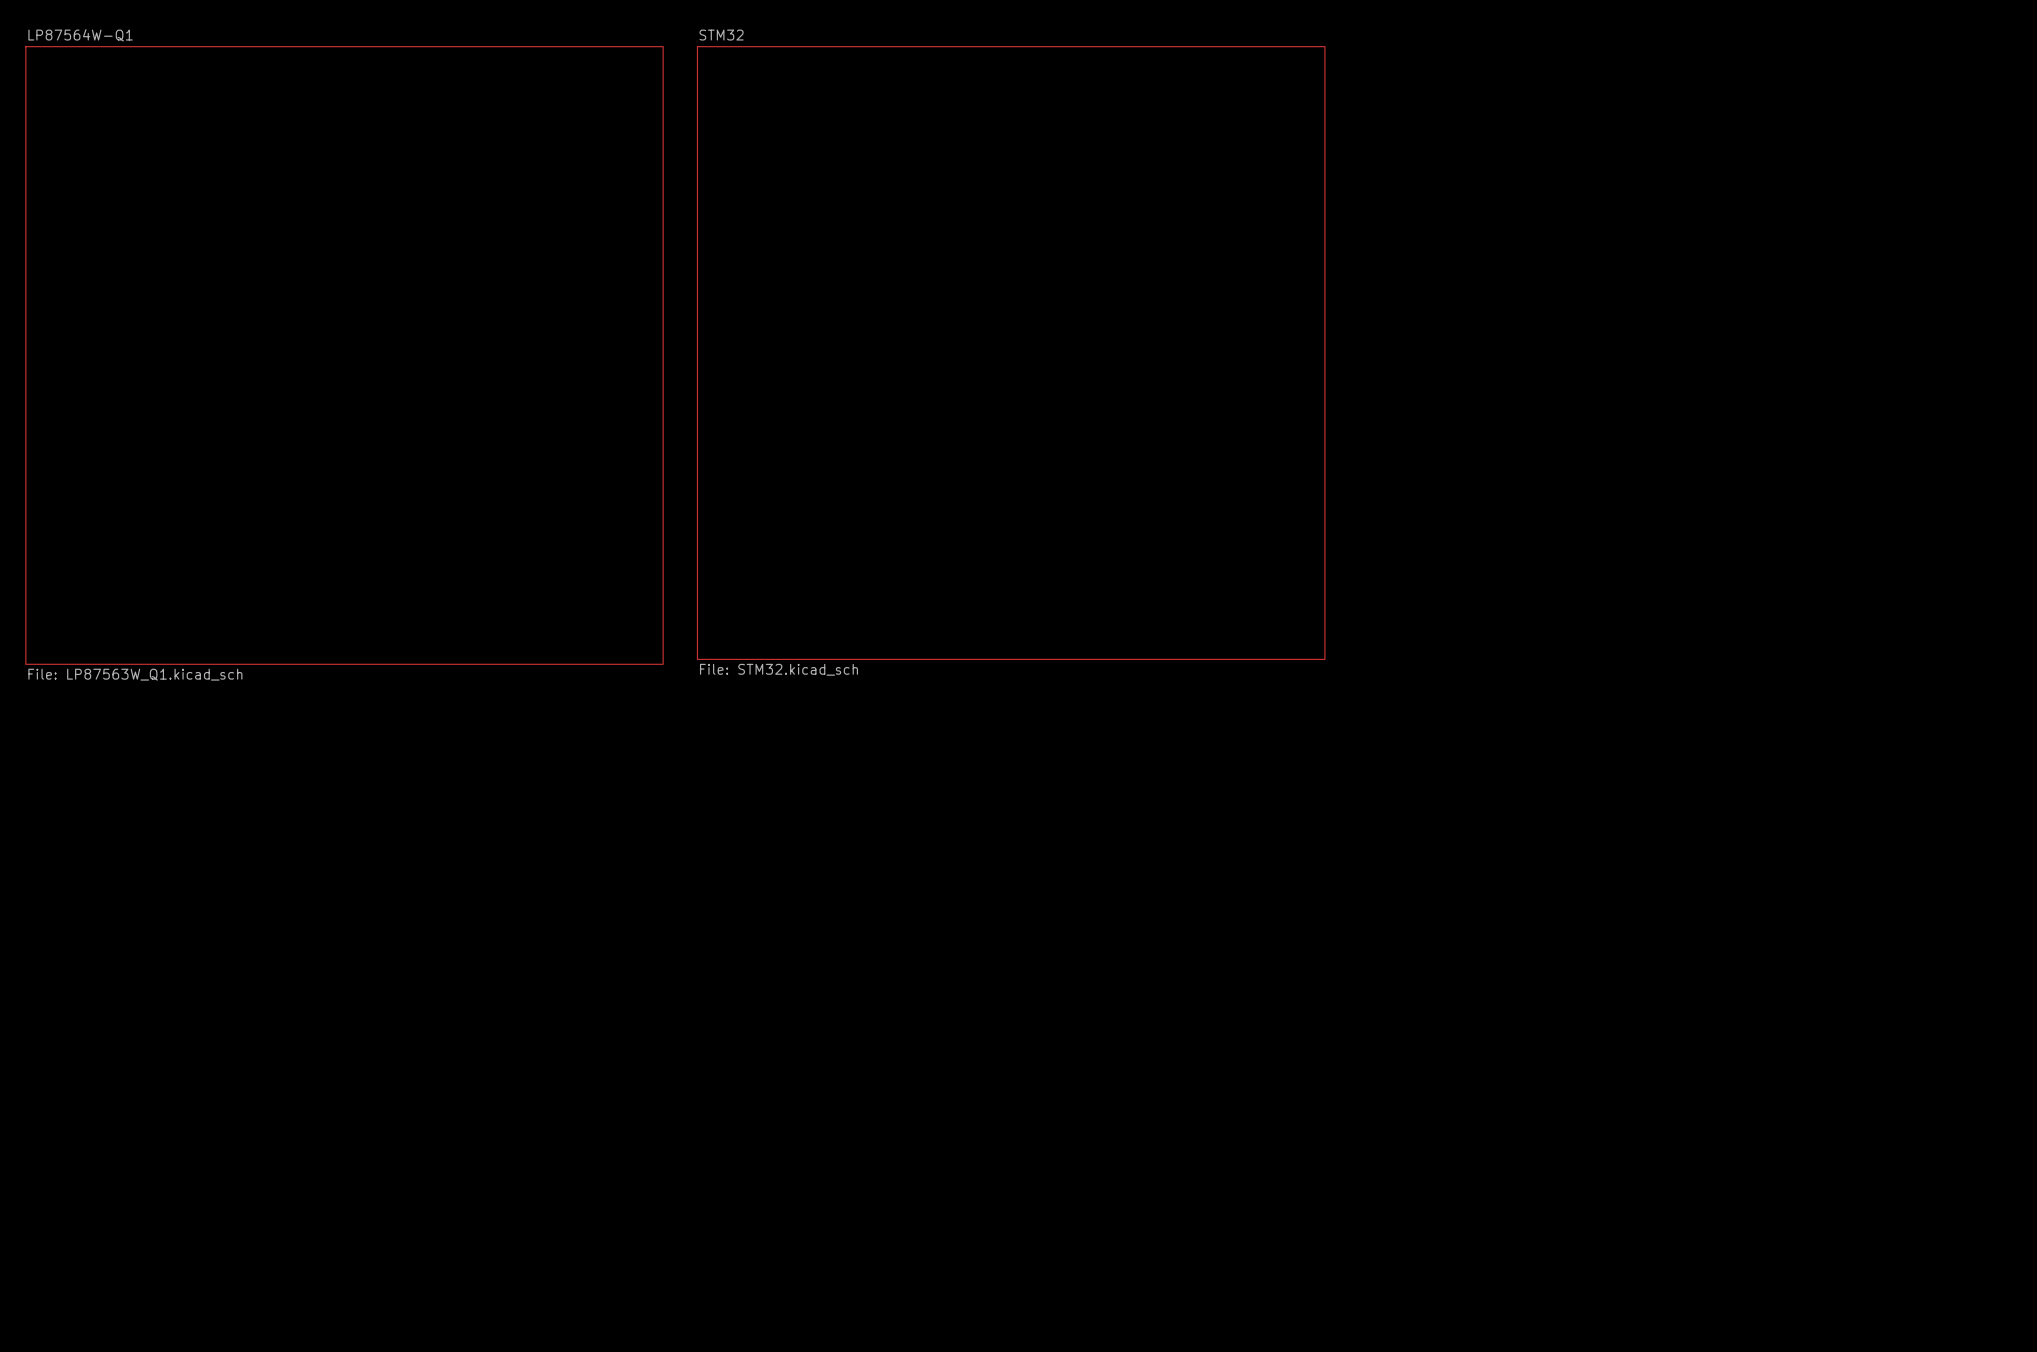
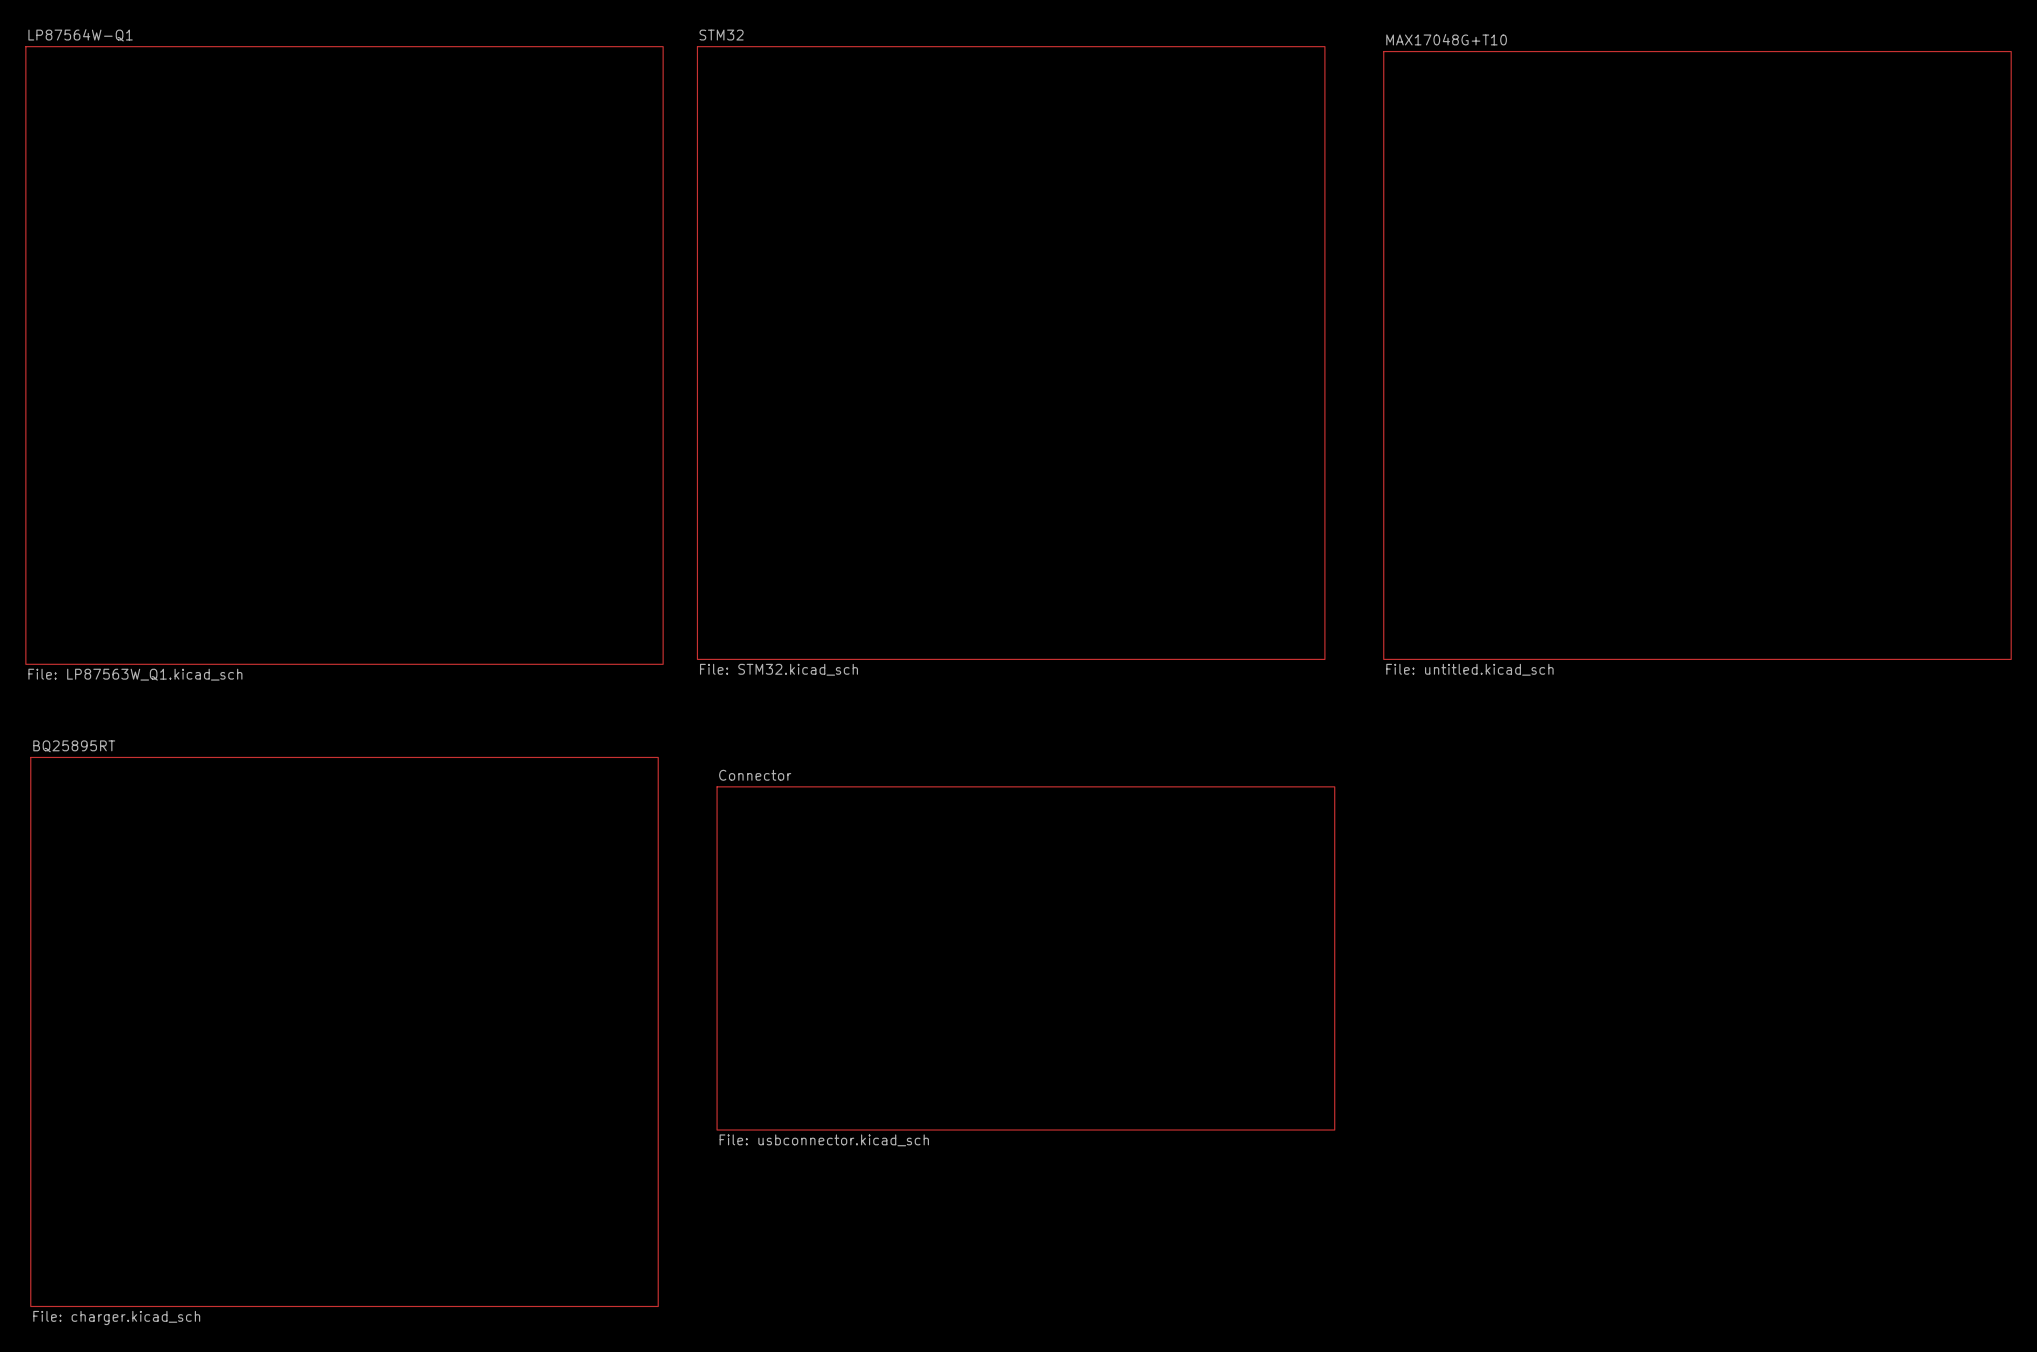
sheet MAX17048G+T10: none -> File: untitled.kicad_sch (1697, 355)
sheet Connector: none -> File: usbconnector.kicad_sch (1025, 958)
sheet BQ25895RT: none -> File: charger.kicad_sch (344, 1031)

